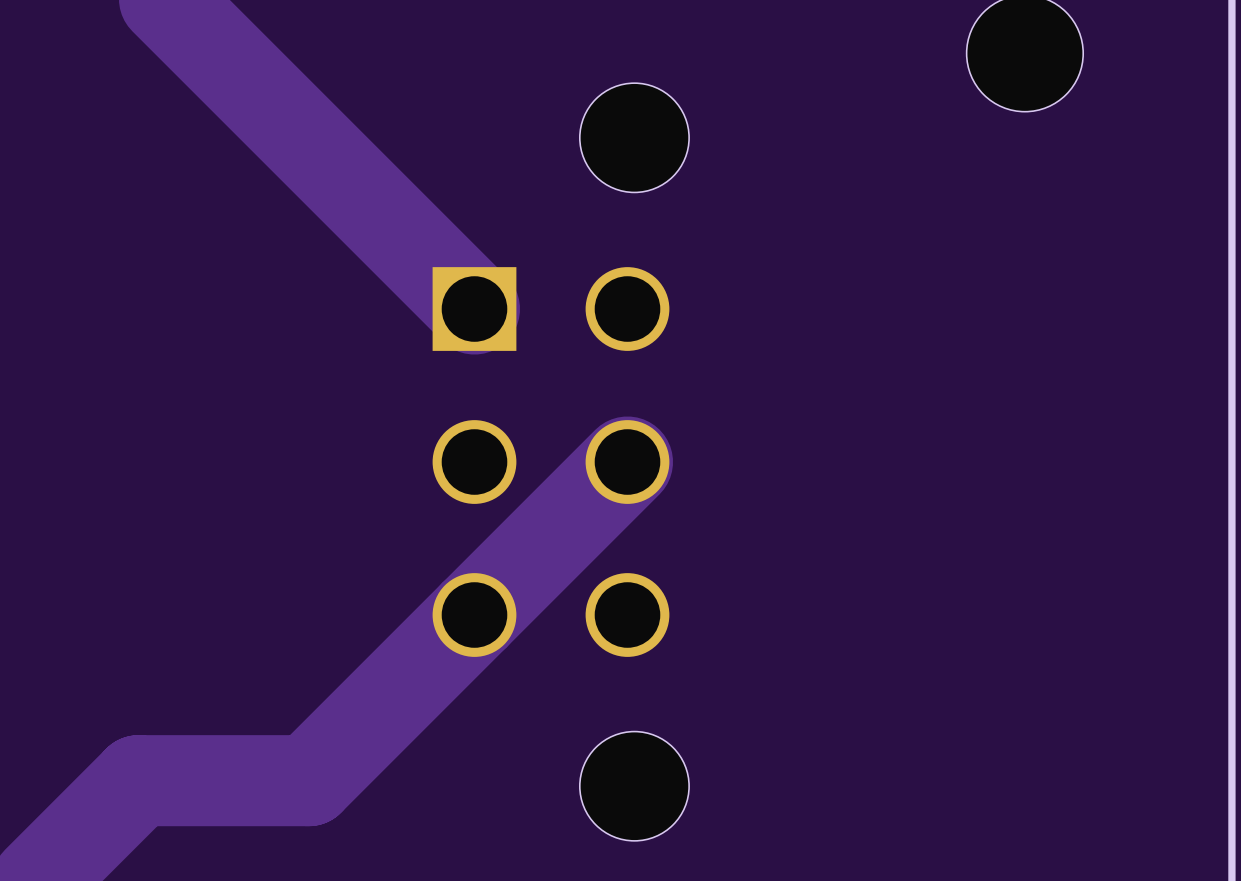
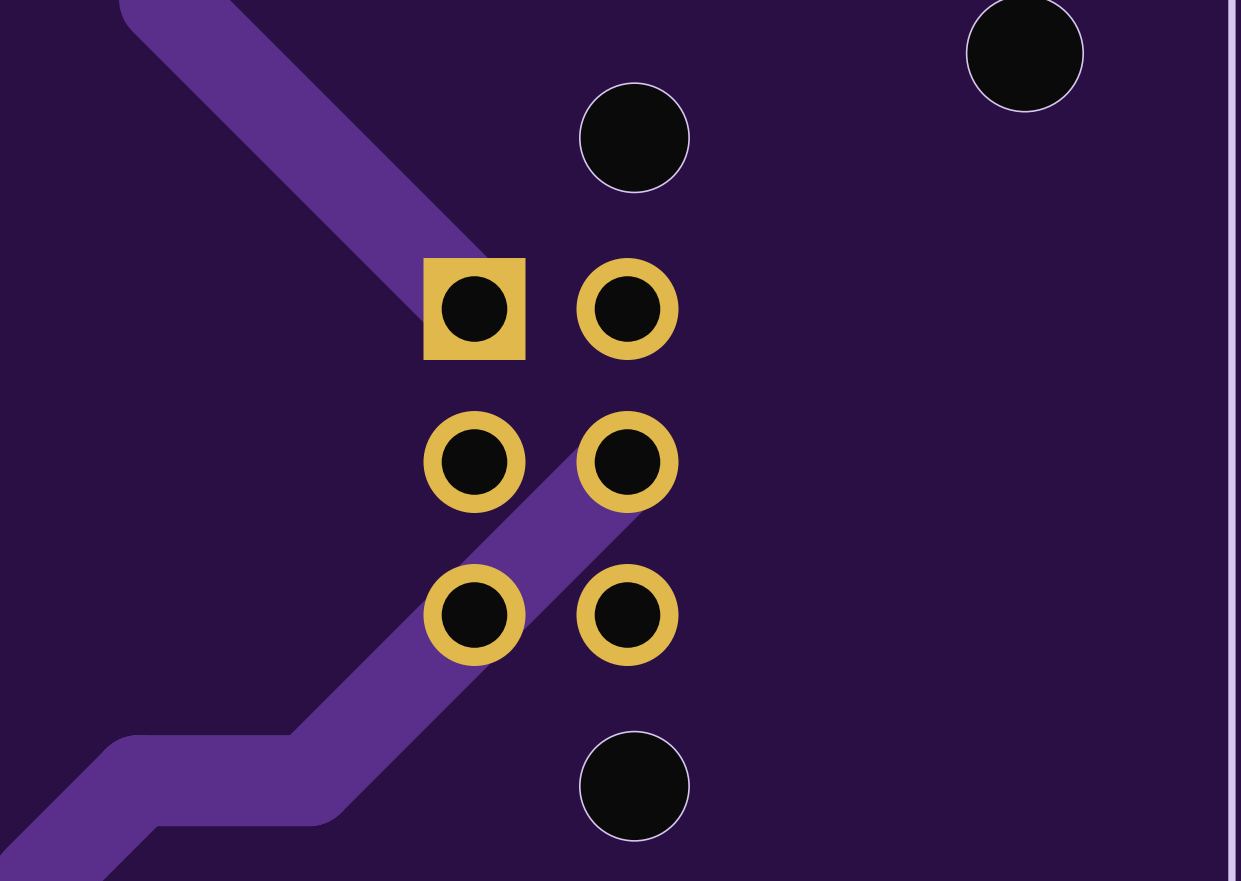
part footprint: [432, 83, 690, 841] -> [423, 83, 690, 841]

